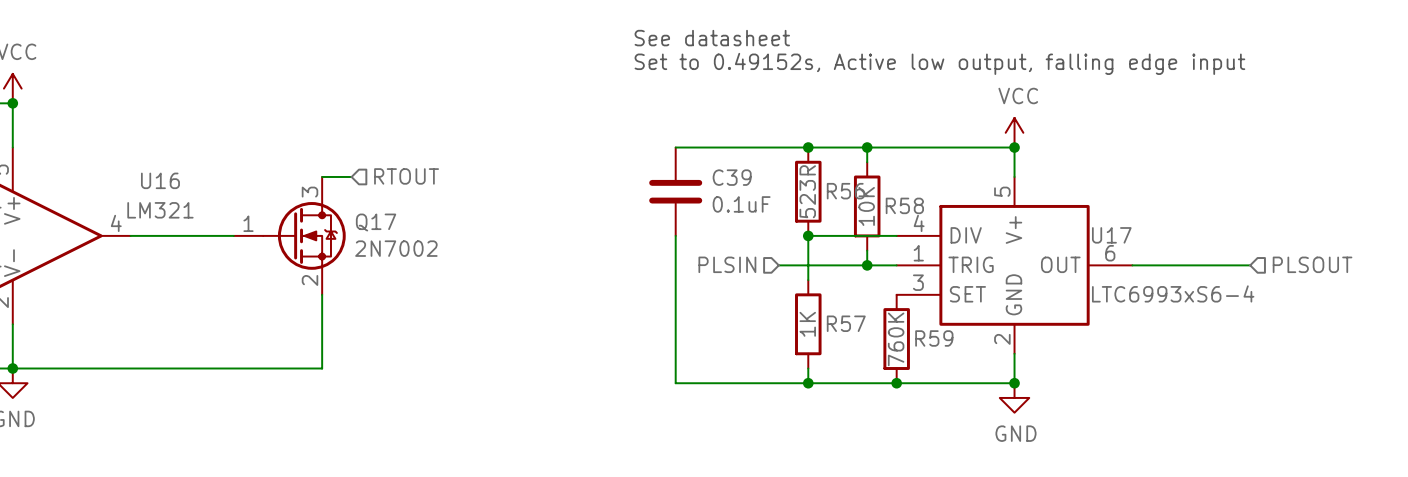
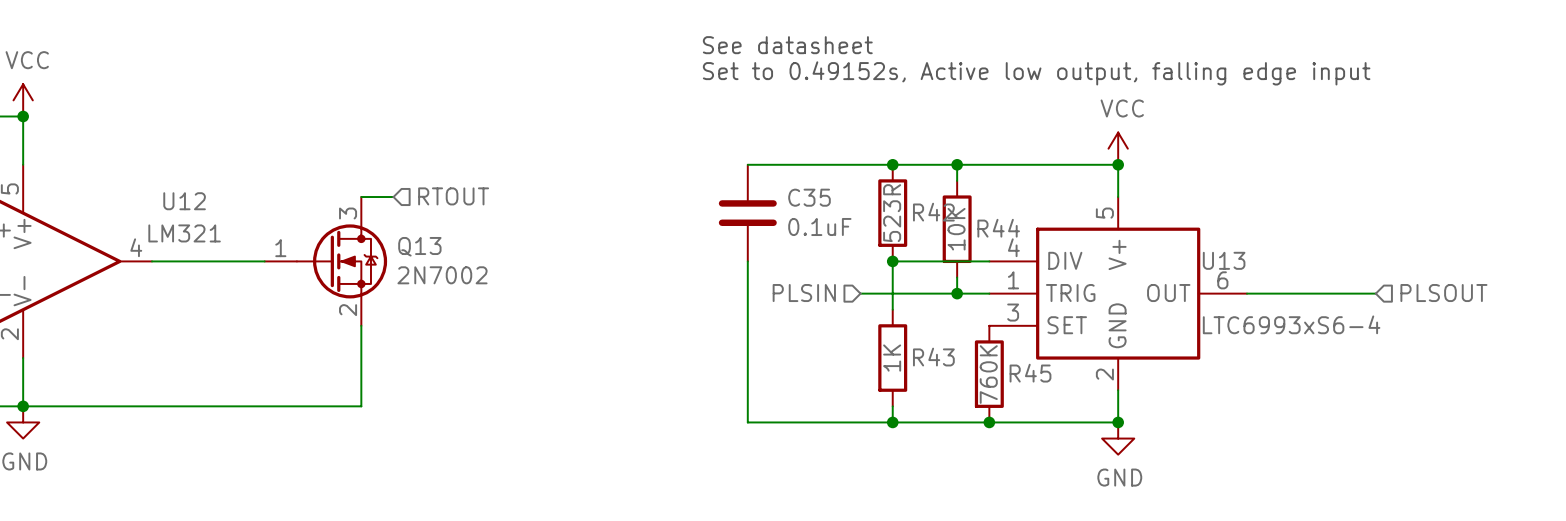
C39 name: C39 (732, 177) -> C35 (809, 197)
U16 name: U16 (160, 180) -> U12 (184, 201)
R56 name: R56 (845, 191) -> R42 (933, 212)
R58 name: R58 (904, 205) -> R44 (998, 228)
Q17 name: Q17 (376, 222) -> Q13 (419, 246)
U17 name: U17 (1111, 235) -> U13 (1224, 260)
R57 name: R57 (846, 323) -> R43 (933, 357)
R59 name: R59 (934, 338) -> R45 (1030, 373)

